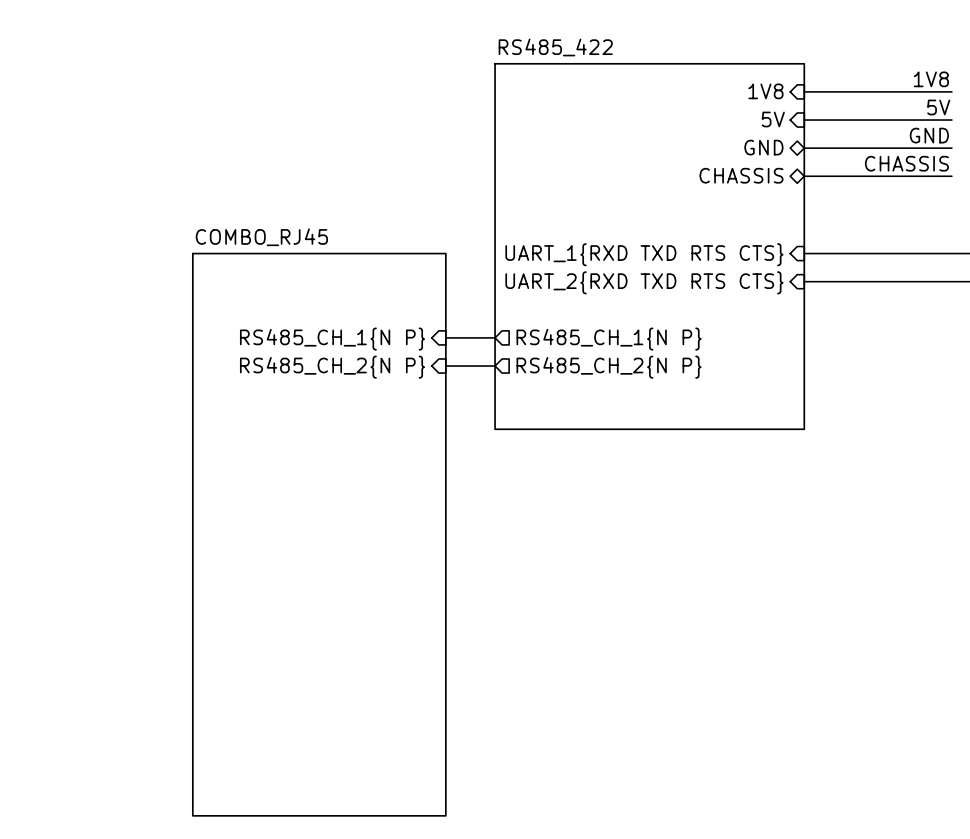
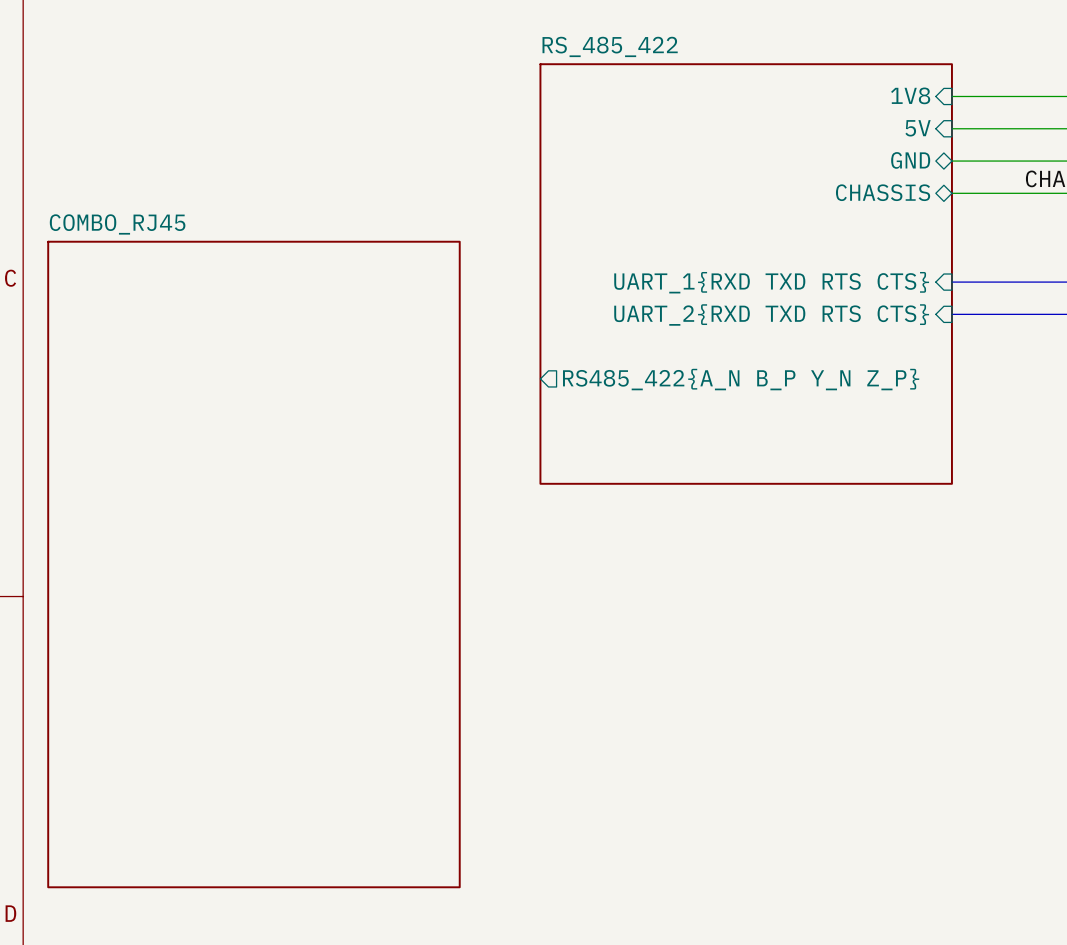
sheet COMBO_RJ45 name position: COMBO_RJ45 (261, 237) -> COMBO_RJ45 (117, 224)
sheet RS_485_422: none -> (746, 274)
sheet RS485_422: (649, 246) -> none
sheet COMBO_RJ45 shape: [191, 252, 447, 817] -> [47, 240, 461, 889]
bus: (445, 337) (495, 337) -> none
sheet pin: RS485_CH_1{N P} (332, 339) -> none
sheet pin: RS485_CH_1{N P} (609, 339) -> none
sheet pin: none -> RS485_422{A_N B_P Y_N Z_P} (741, 379)
bus: (445, 366) (495, 366) -> none
sheet pin: RS485_CH_2{N P} (332, 367) -> none
sheet pin: RS485_CH_2{N P} (609, 367) -> none

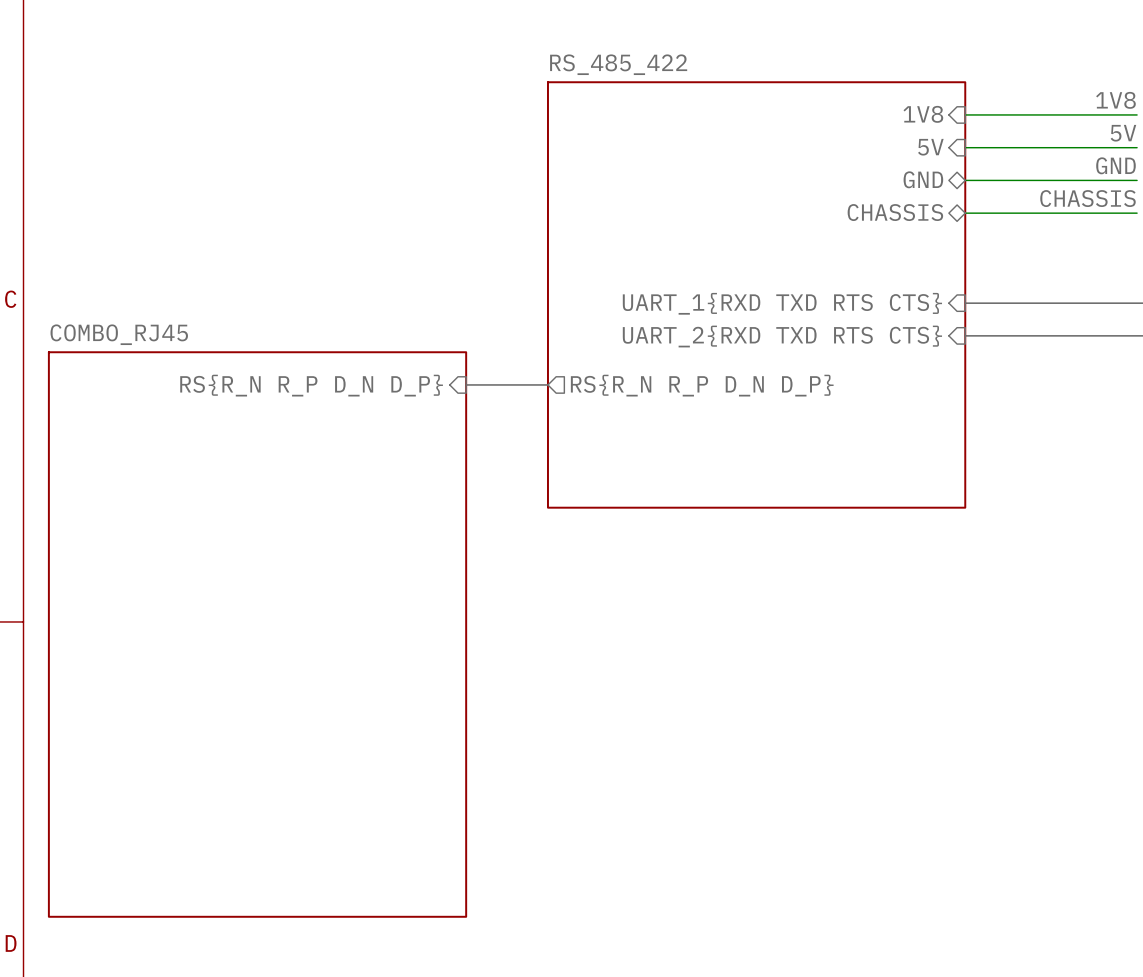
sheet COMBO_RJ45 name position: COMBO_RJ45 (117, 224) -> COMBO_RJ45 (119, 334)
sheet COMBO_RJ45 shape: [47, 240, 461, 889] -> [47, 351, 468, 918]
bus: none -> (466, 384) (547, 384)
sheet pin: none -> RS{R_N R_P D_N D_P} (311, 385)
sheet pin: RS485_422{A_N B_P Y_N Z_P} (741, 379) -> RS{R_N R_P D_N D_P} (702, 385)

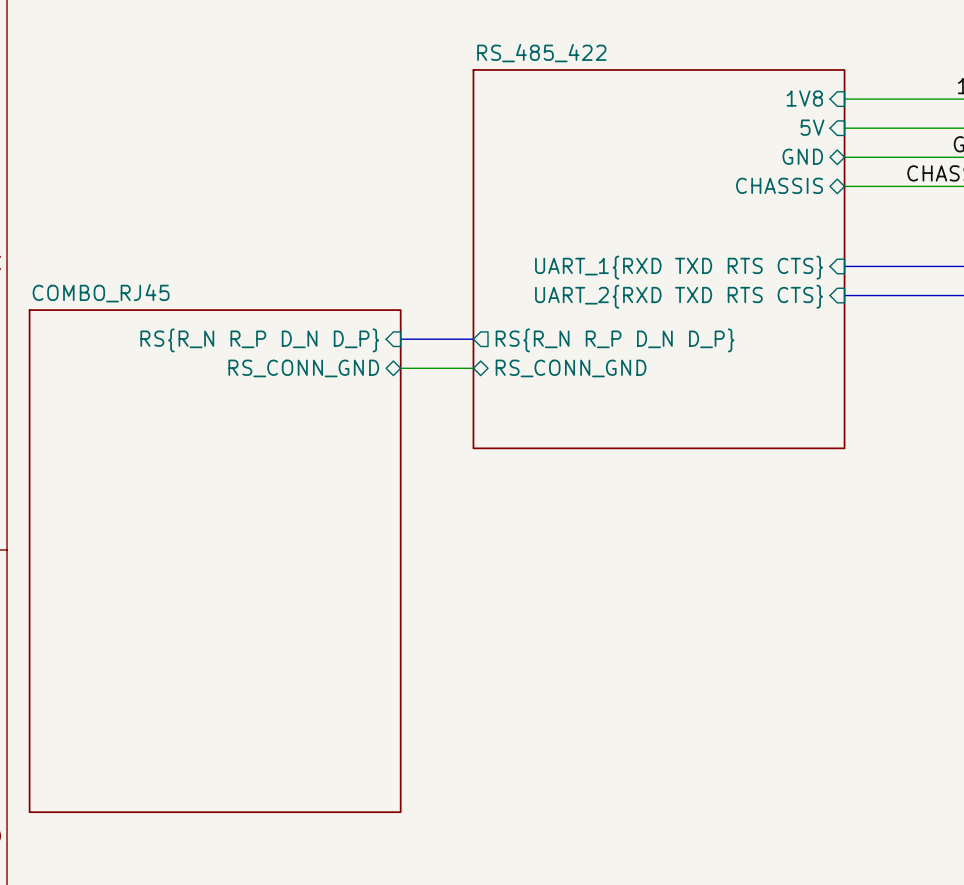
wire: none -> (400, 368) (473, 368)
sheet pin: none -> RS_CONN_GND (303, 368)
sheet pin: none -> RS_CONN_GND (571, 368)

